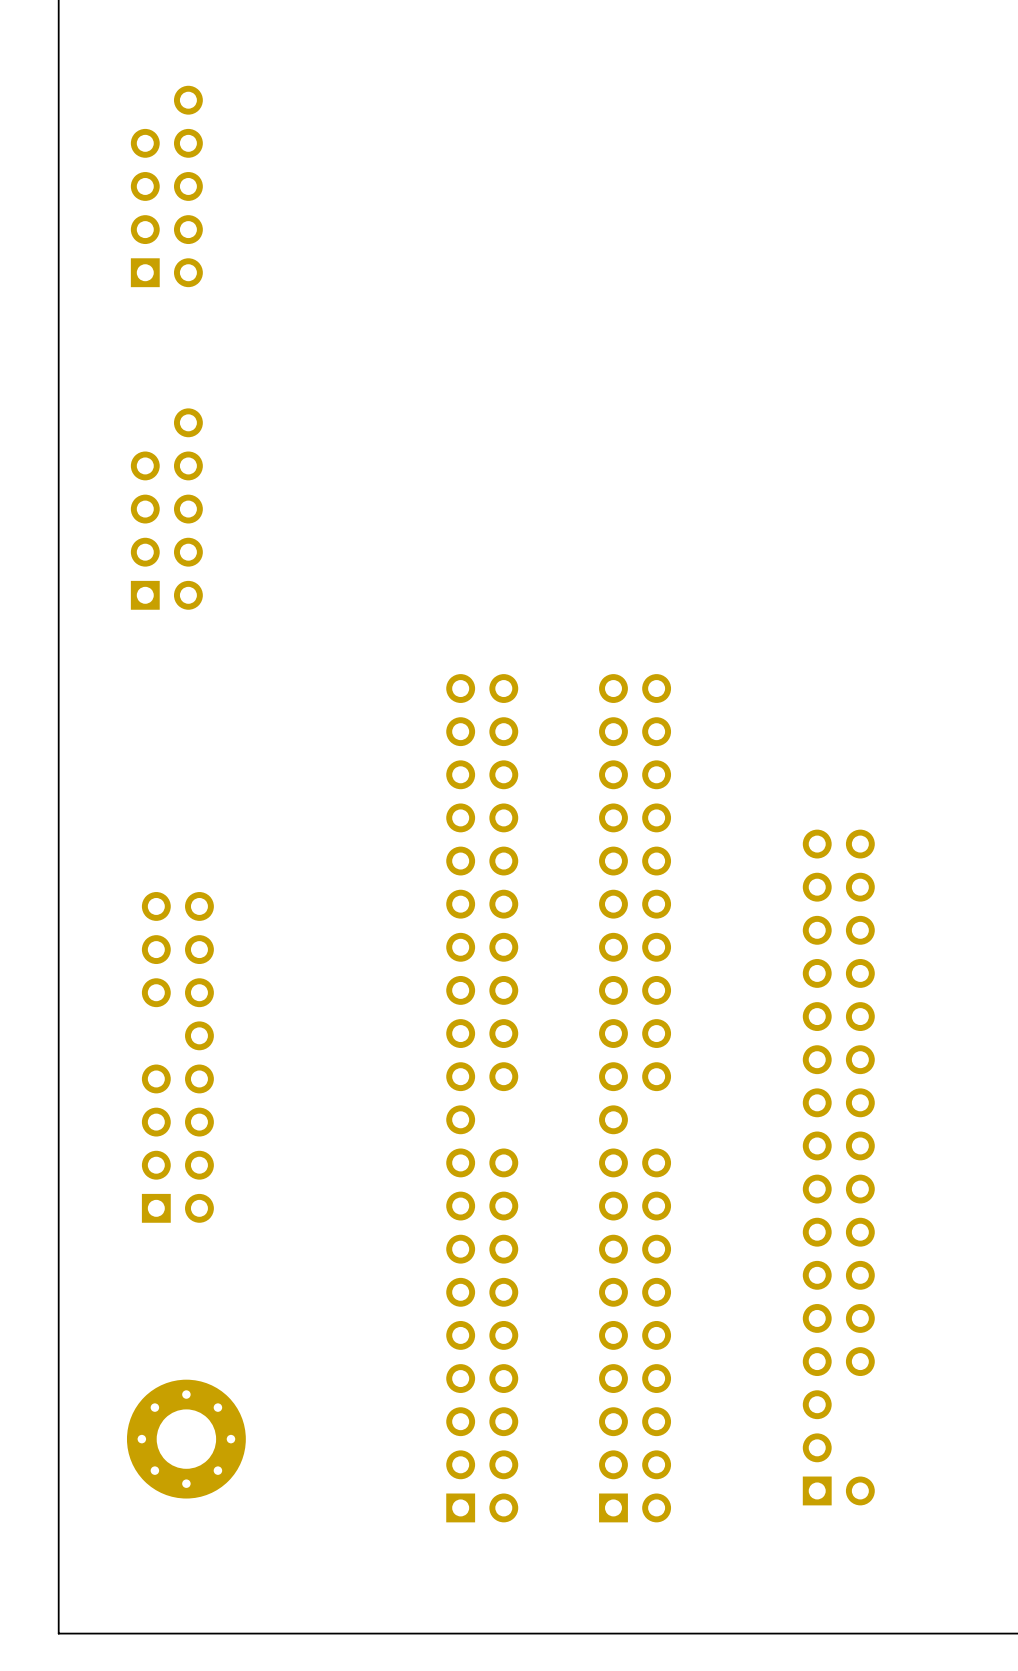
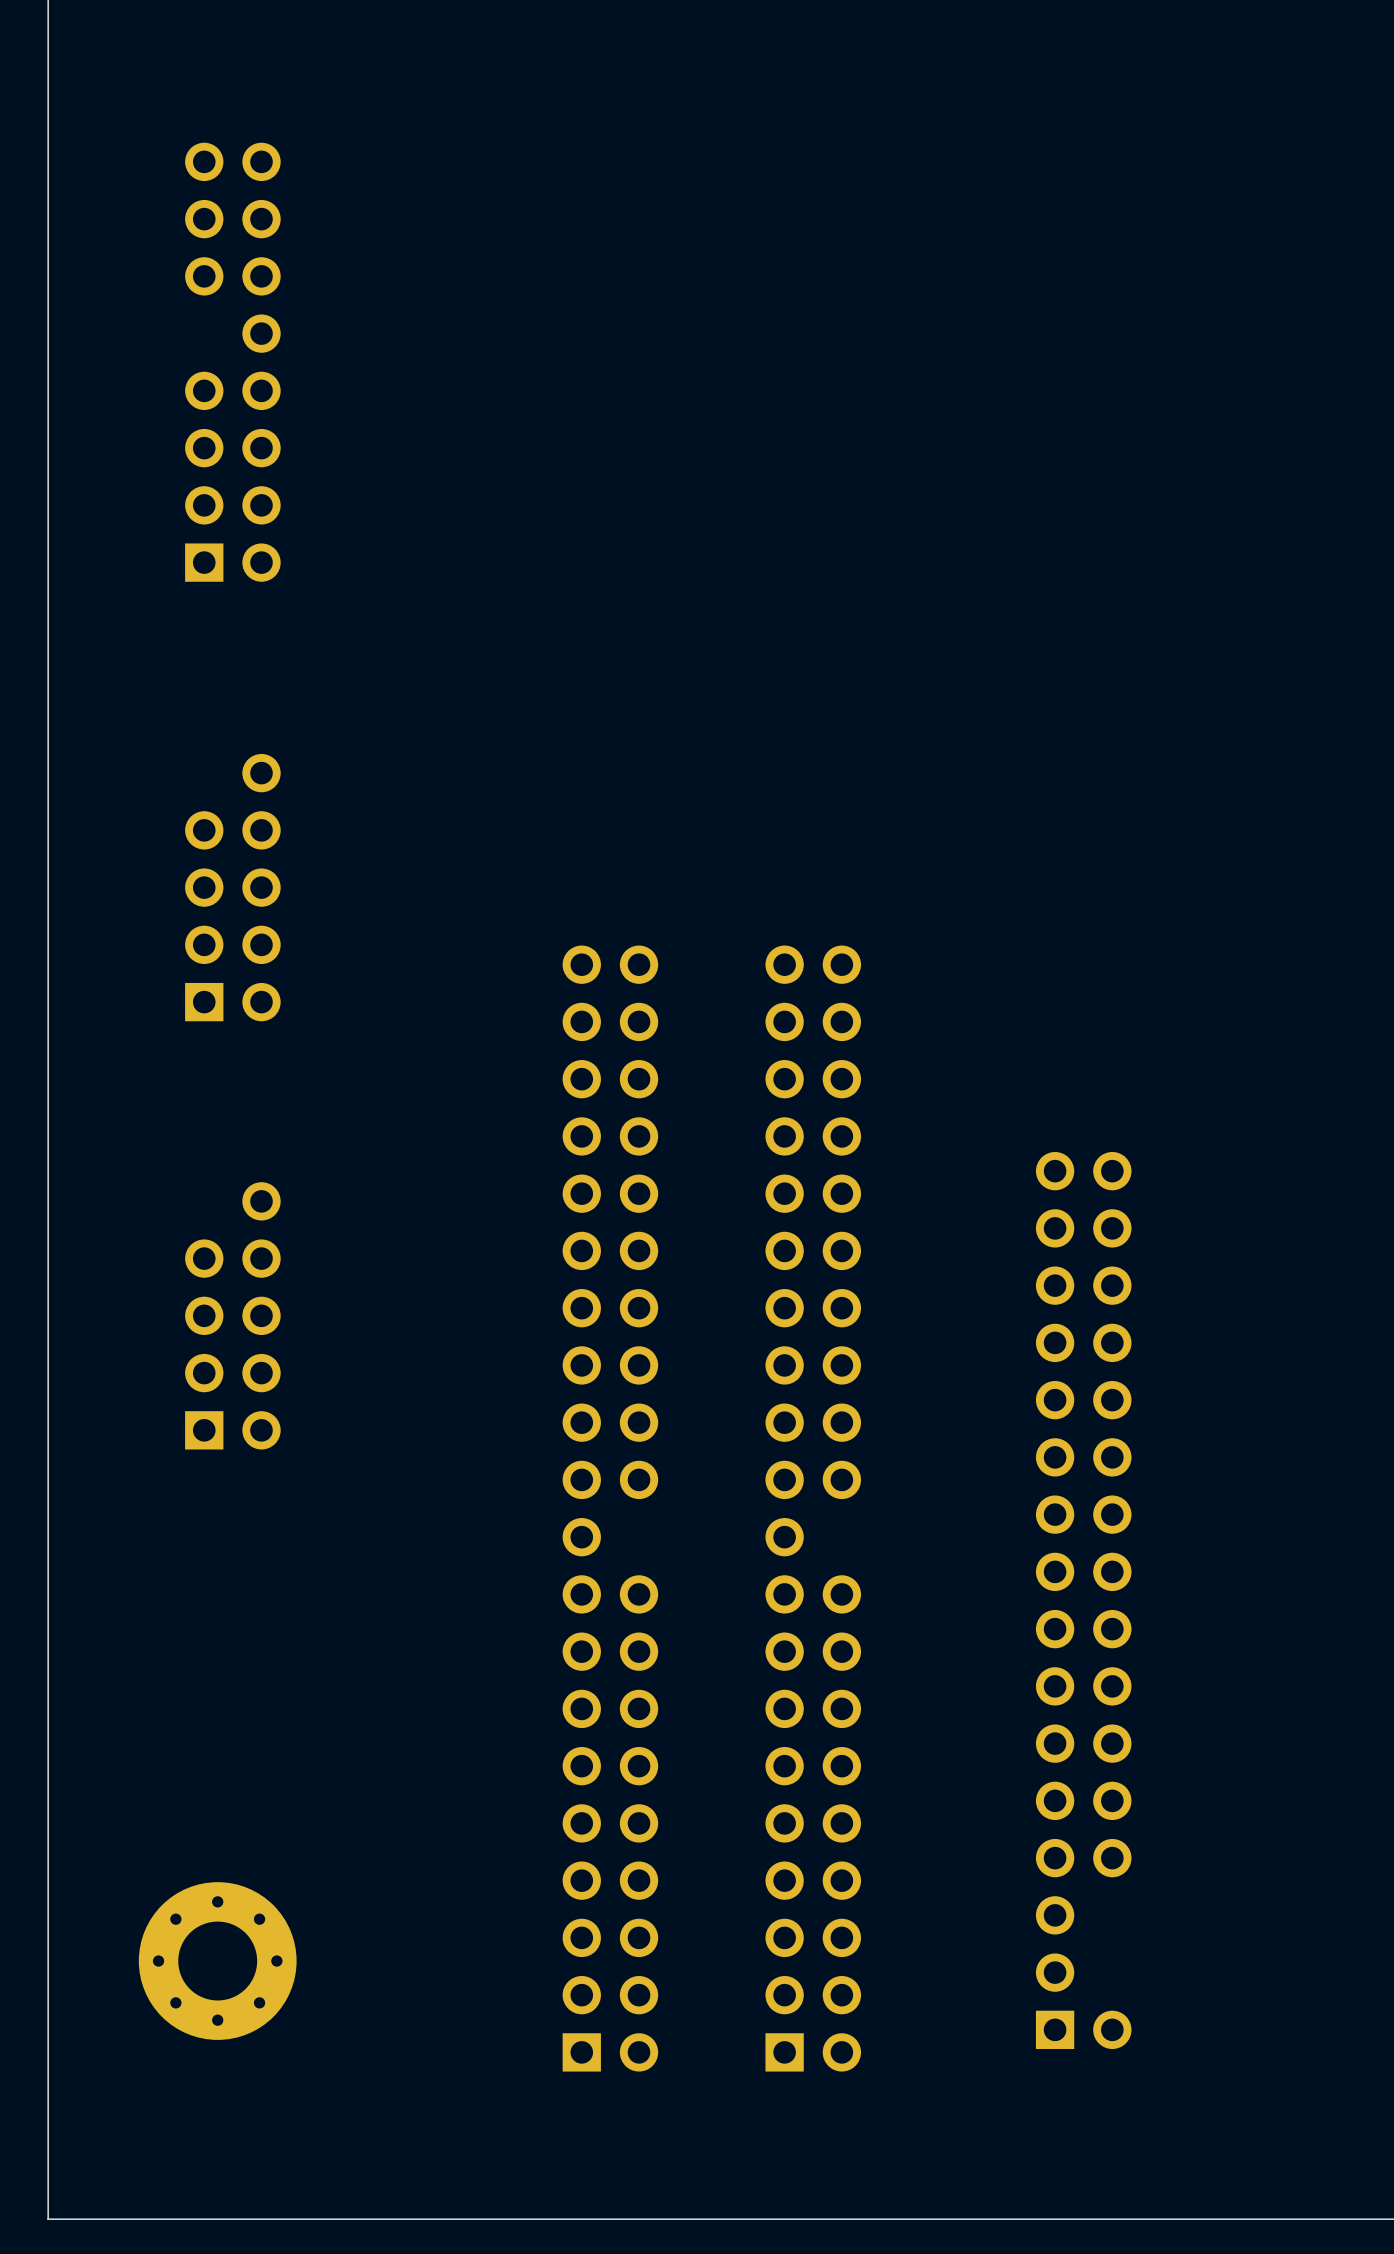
part: (166, 186) -> none
part: none -> (232, 362)
part position: (166, 509) -> (232, 887)
part: none -> (232, 1315)
part: (177, 1057) -> none

